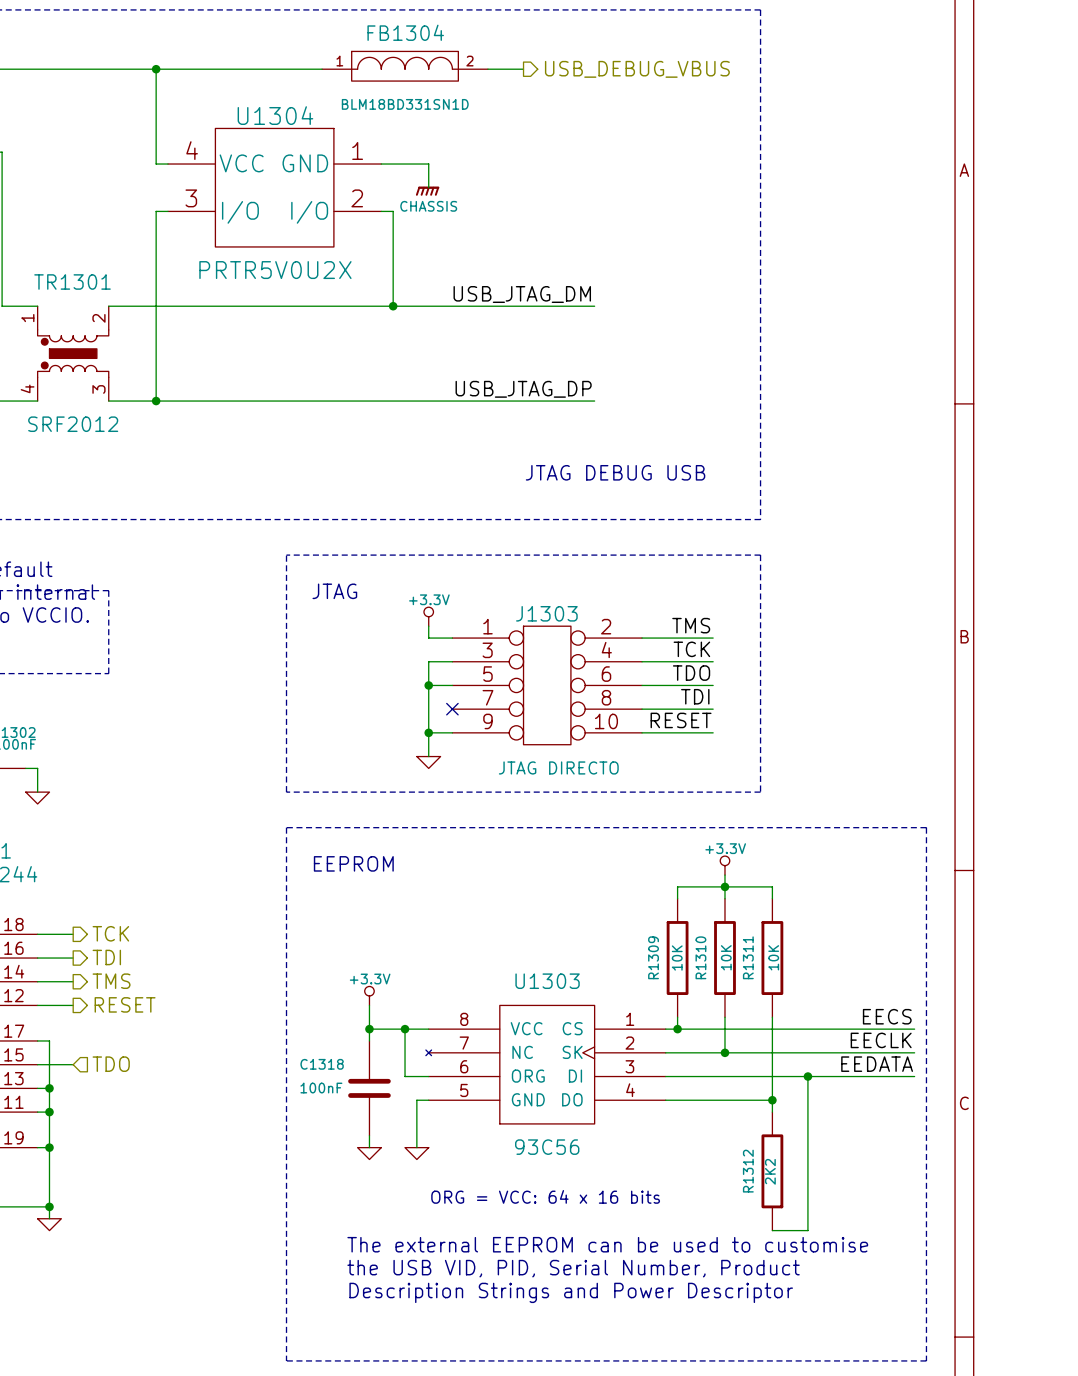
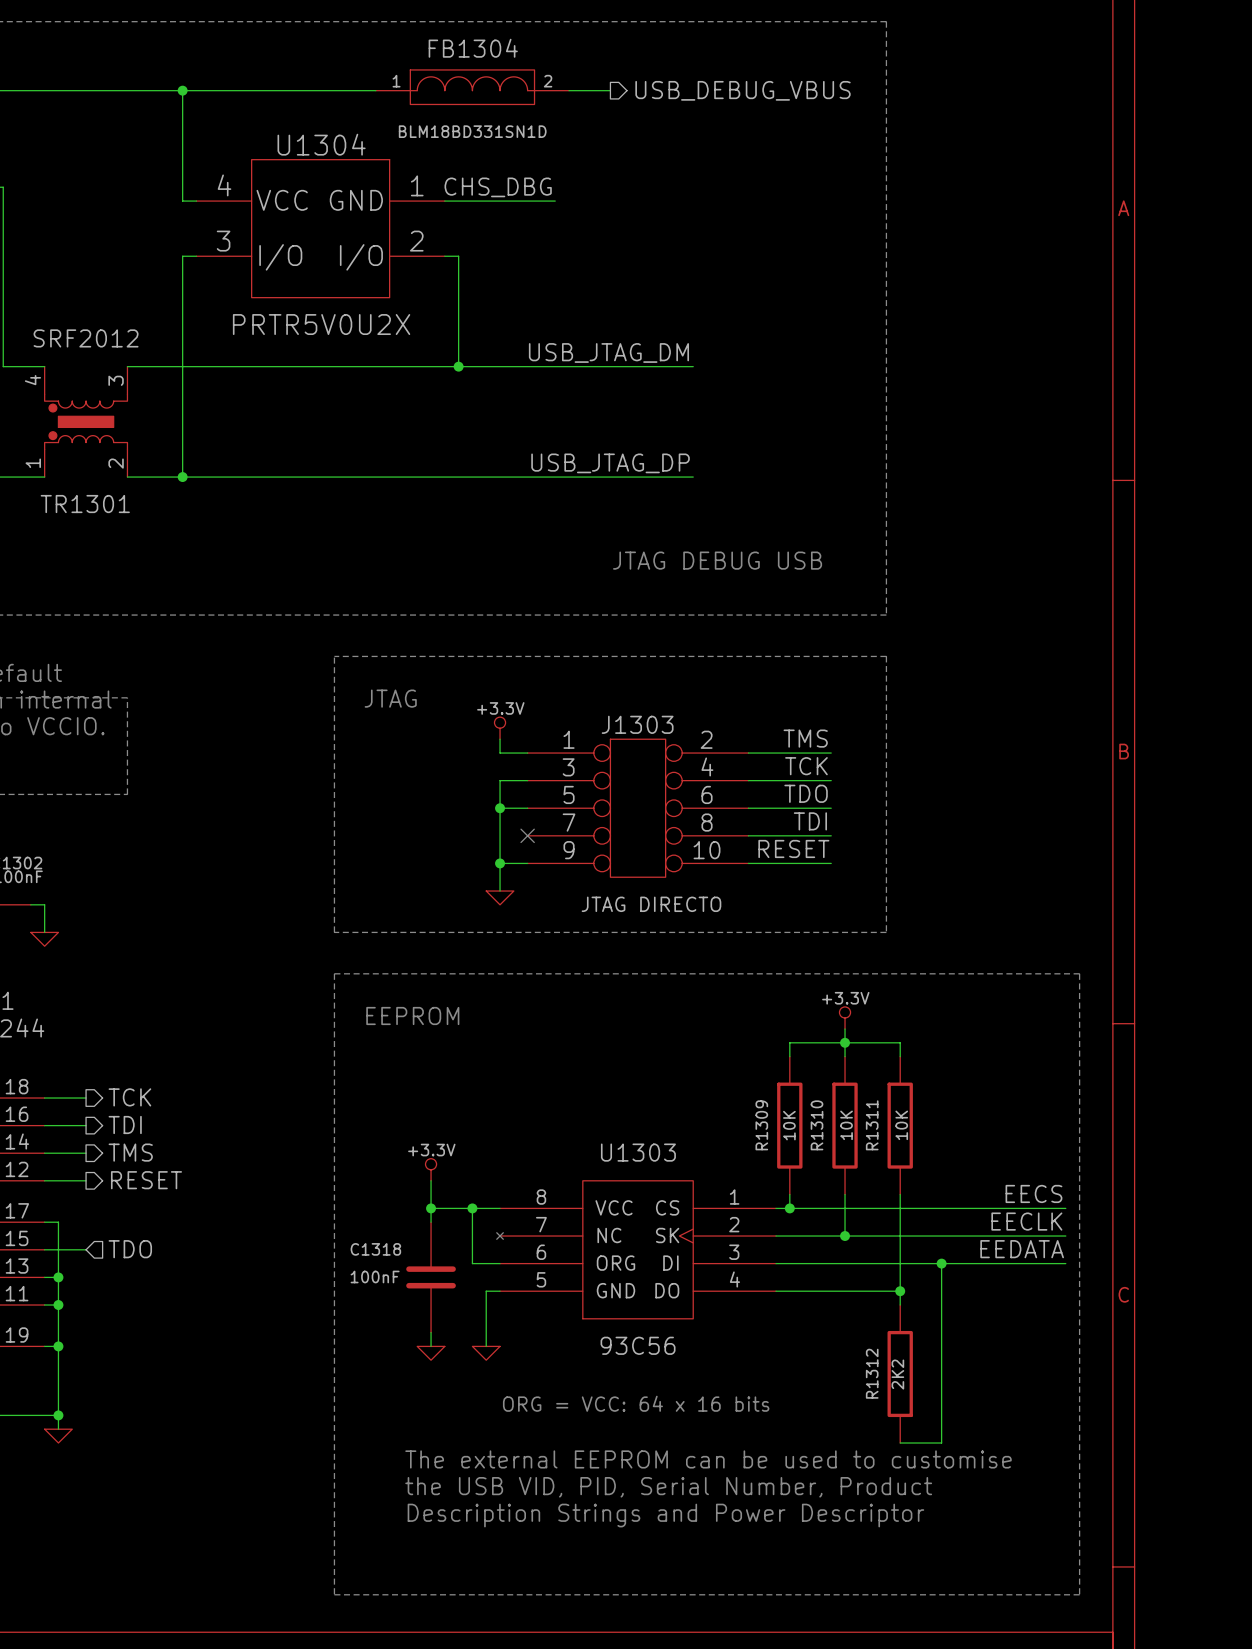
label: none -> CHS_DBG (498, 187)
wire: (428, 164) (428, 187) -> (500, 201) (555, 201)
power symbol: CHASSIS (427, 191) -> none
TR1301 flip: as is (73, 353) -> up-down (86, 421)

